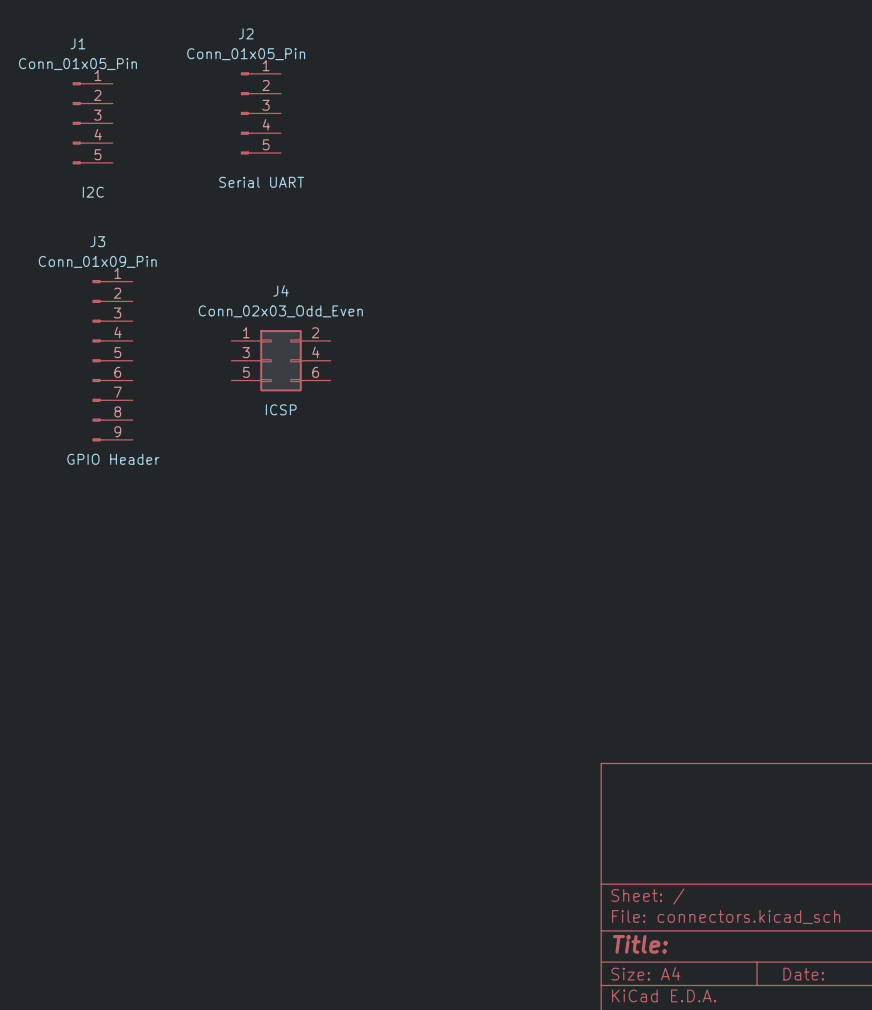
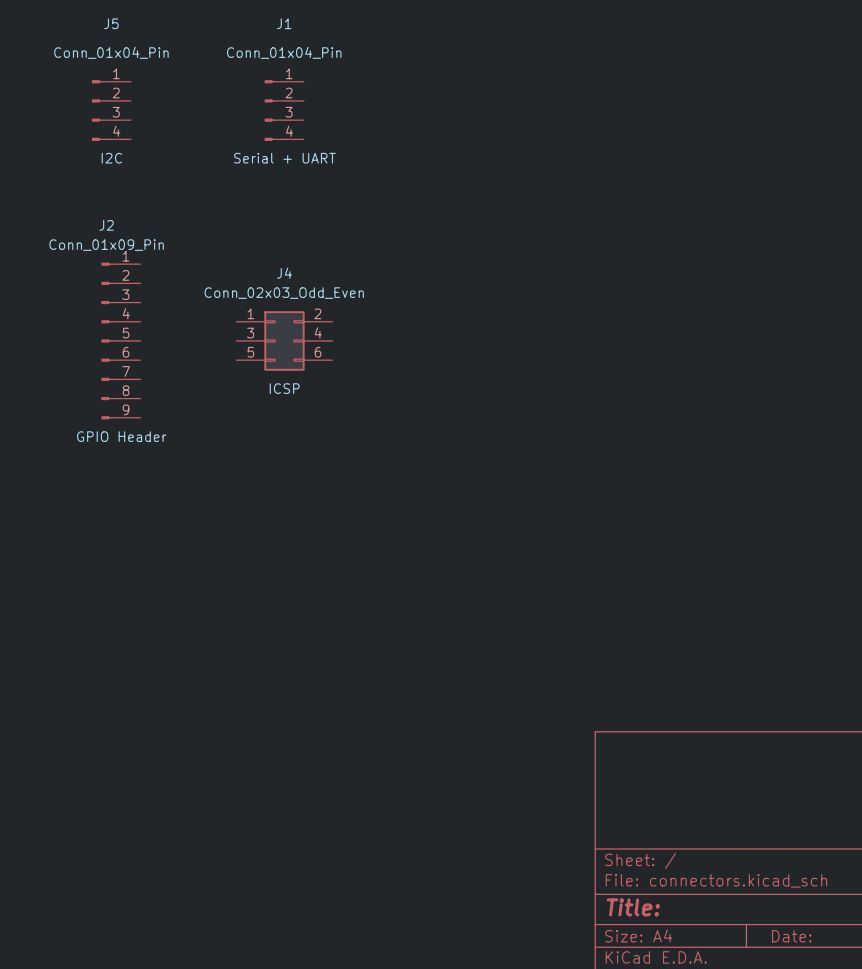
J1 name position: J1 (77, 43) -> J1 (284, 23)
J1 value: Conn_01x05_Pin (77, 64) -> Conn_01x04_Pin (284, 52)
J1 symbol: [72, 82, 113, 165] -> [264, 80, 304, 141]
J2: Conn_01x05_Pin (260, 113) -> none
J5: none -> Conn_01x04_Pin (111, 110)
J1 text: I2C (93, 192) -> Serial + UART (284, 158)
J3 name: J3 (97, 241) -> J2 (106, 225)

